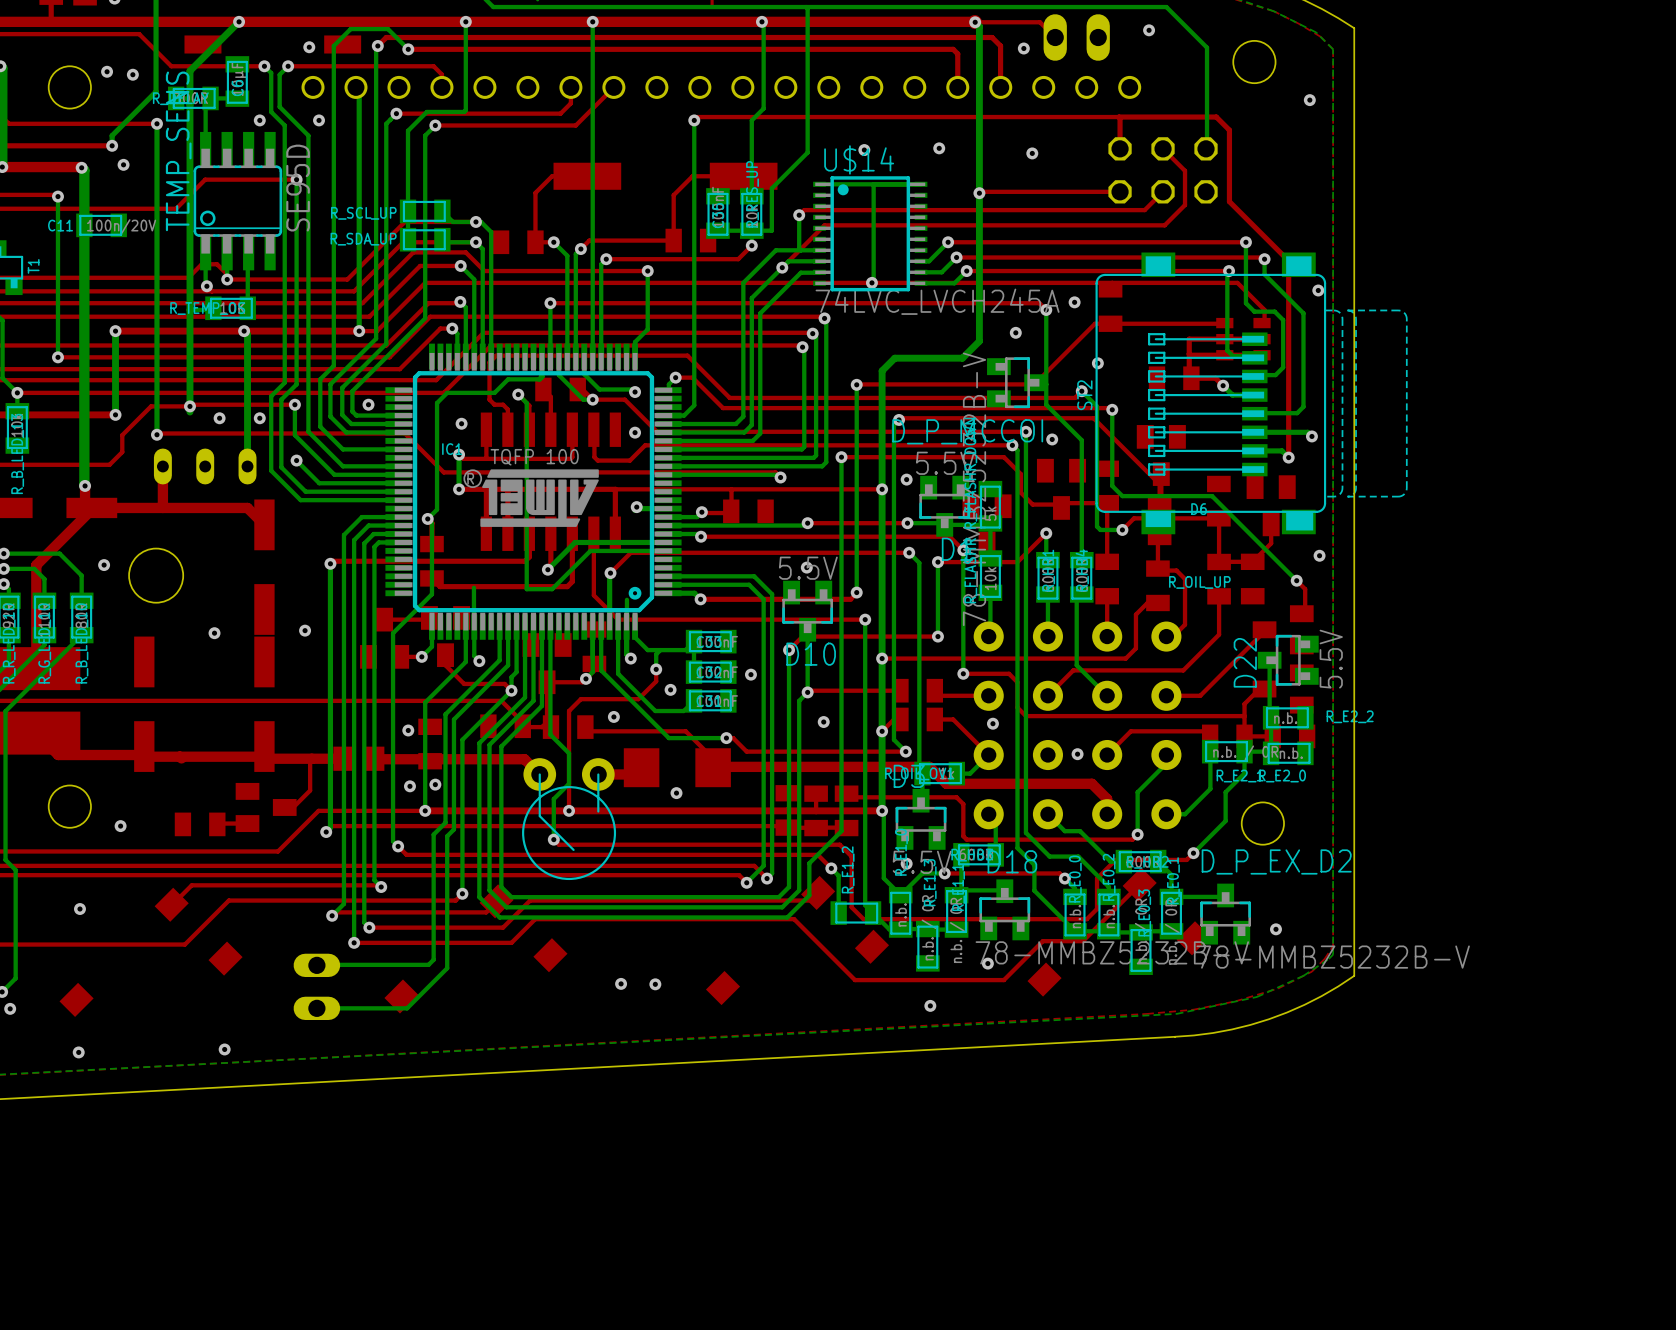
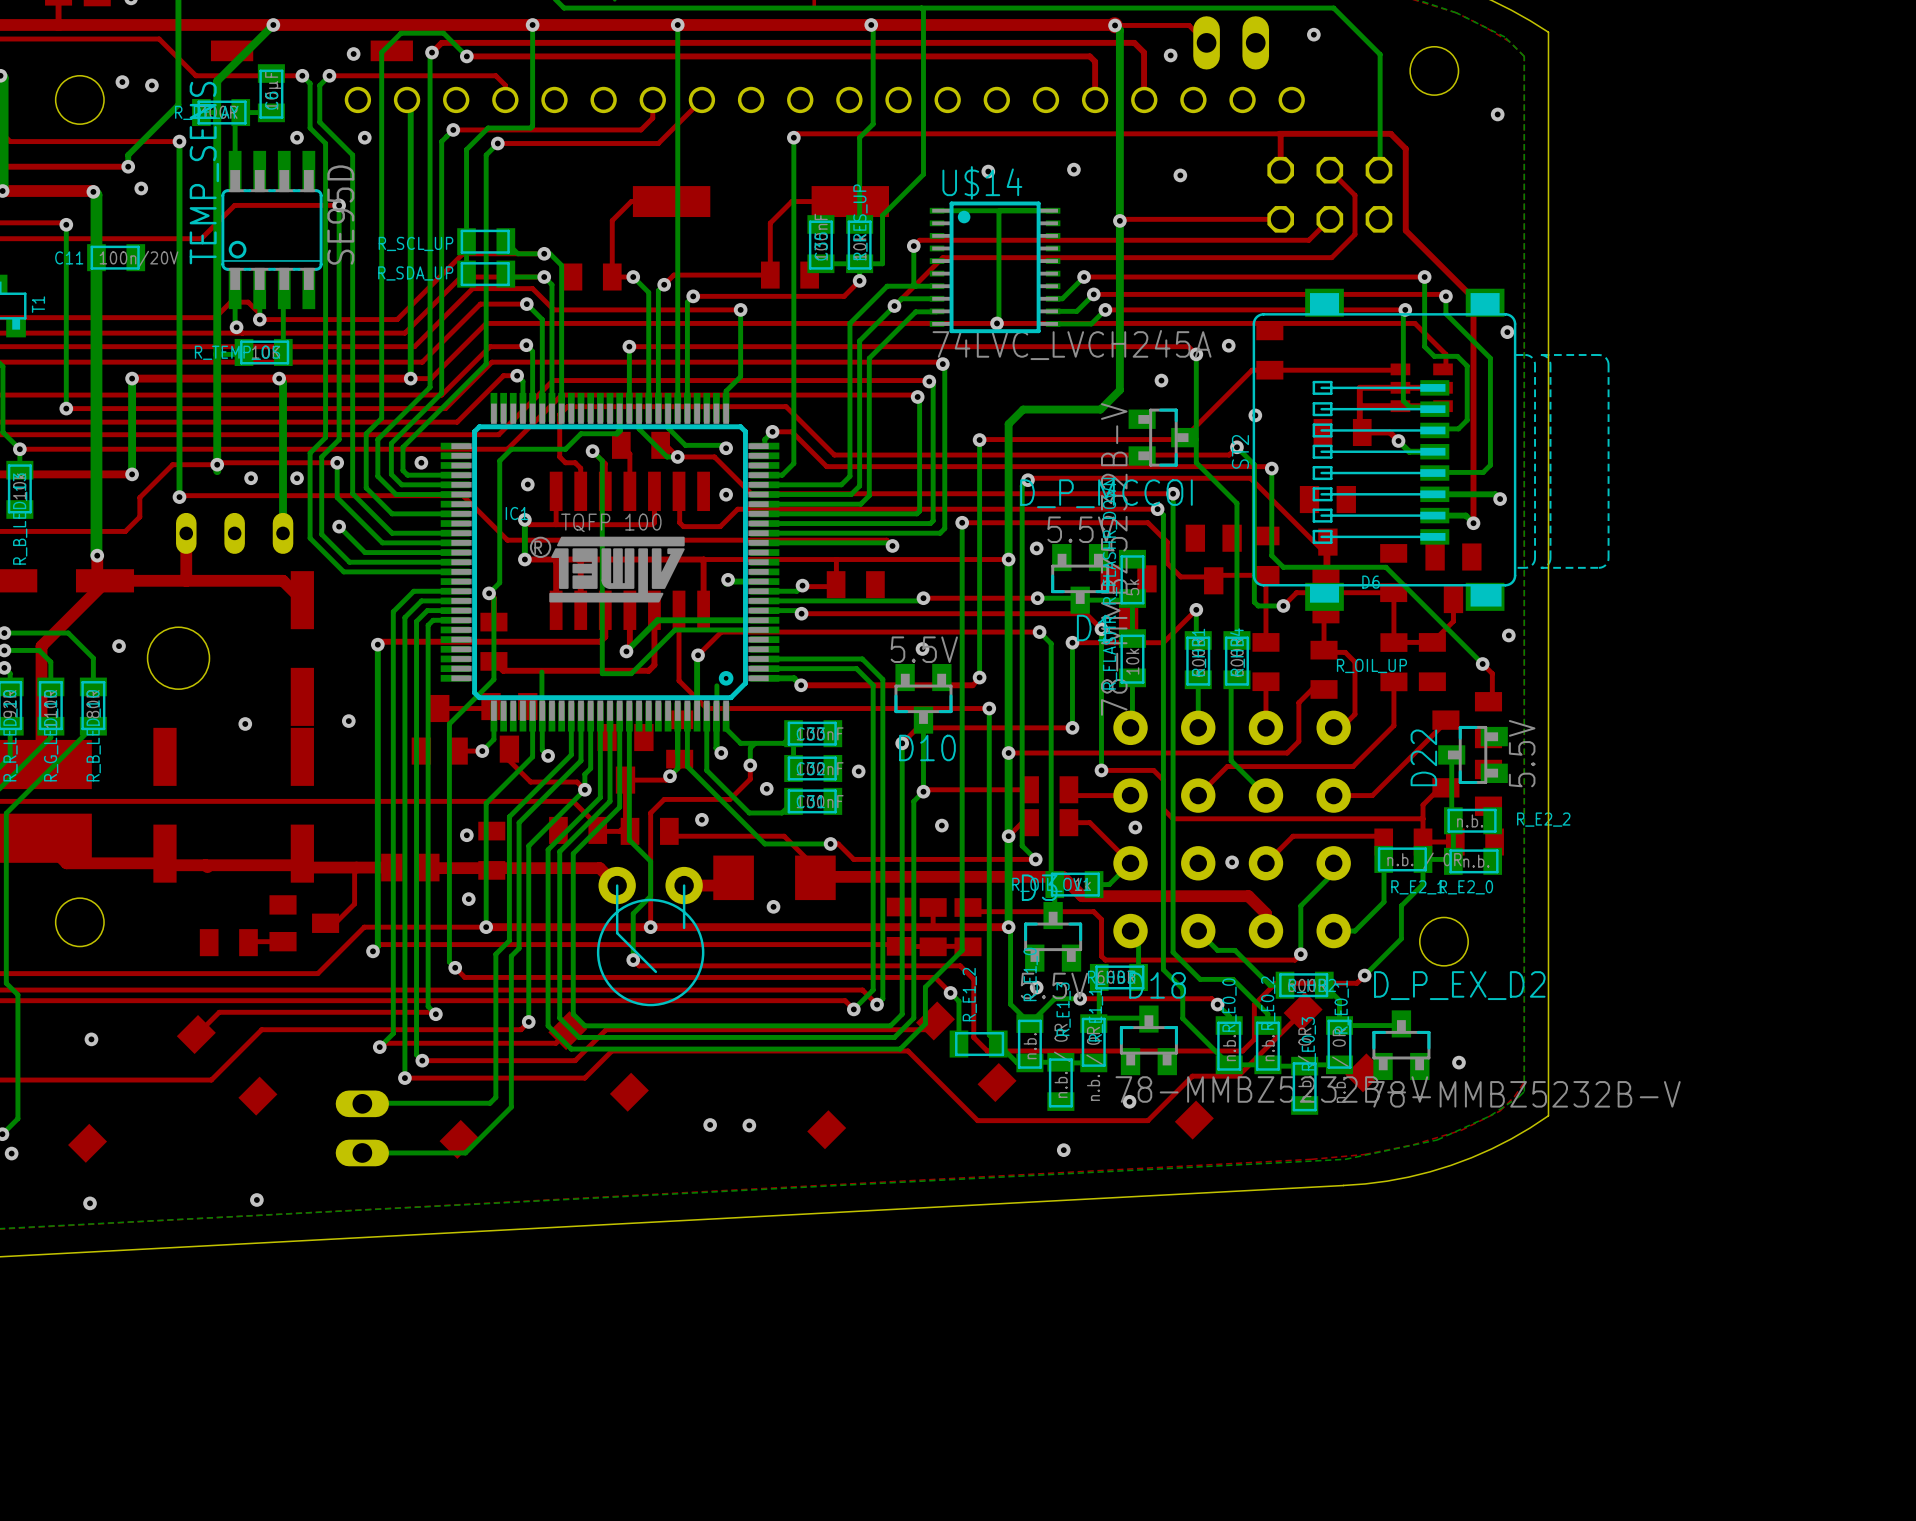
via: (1052, 439) -> none
via: (435, 784) -> none
via: (120, 826) -> none

